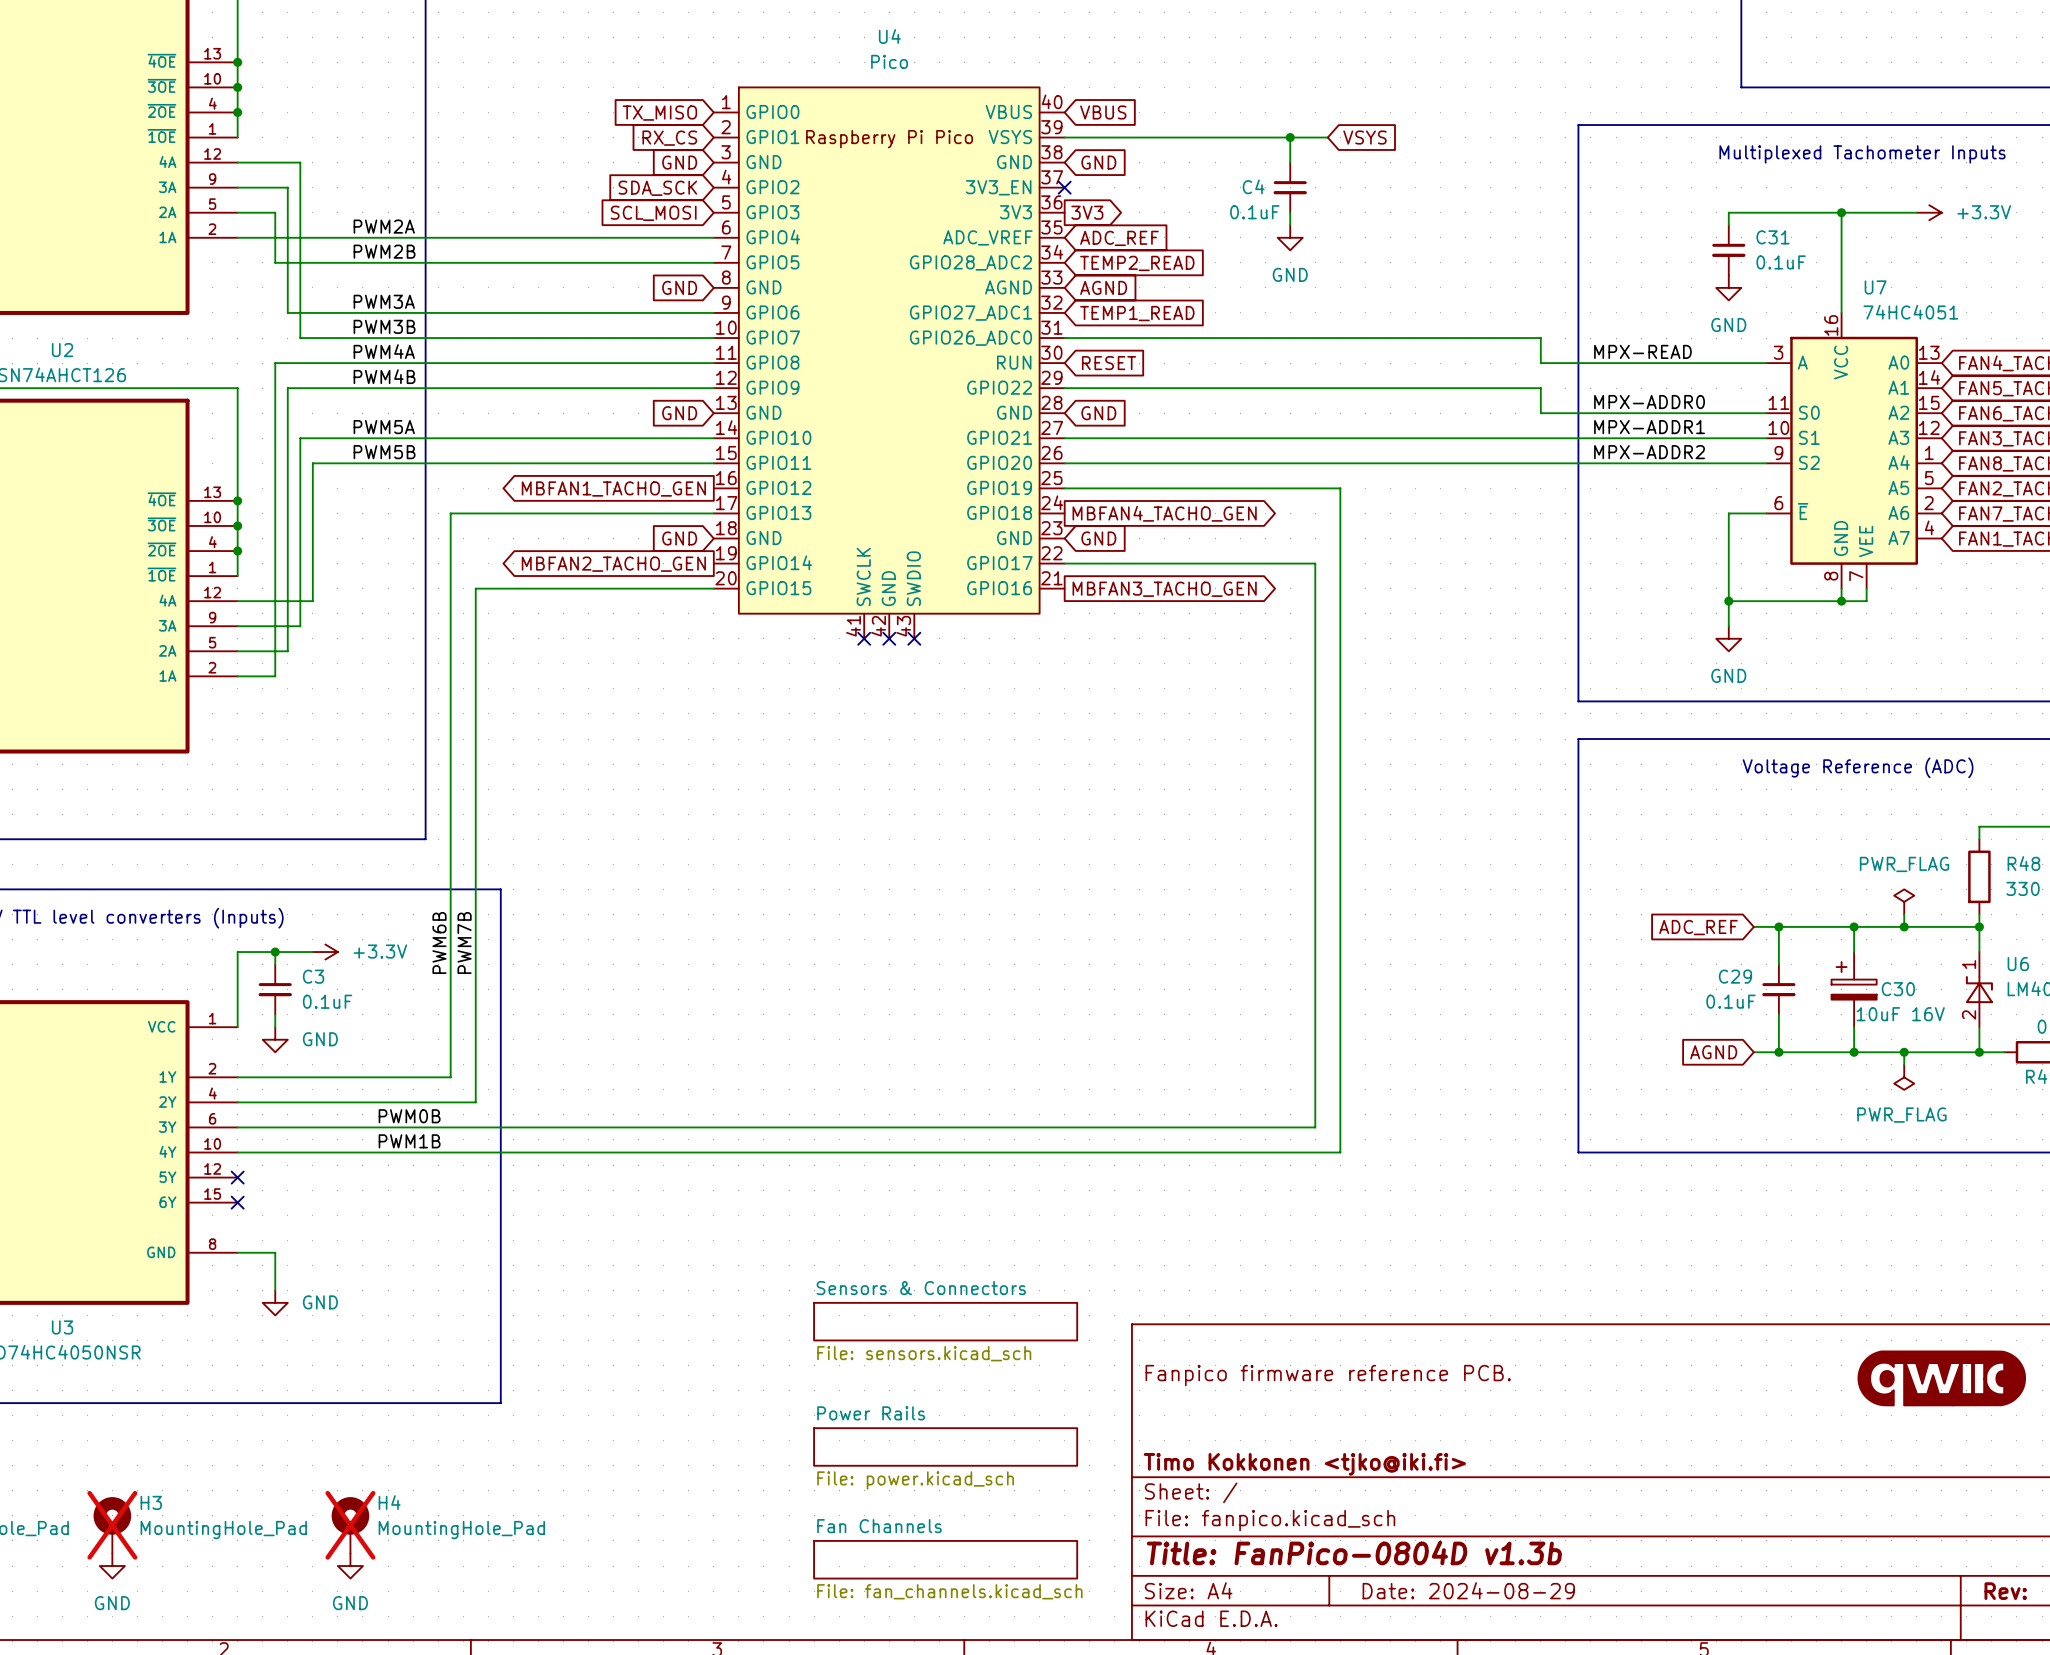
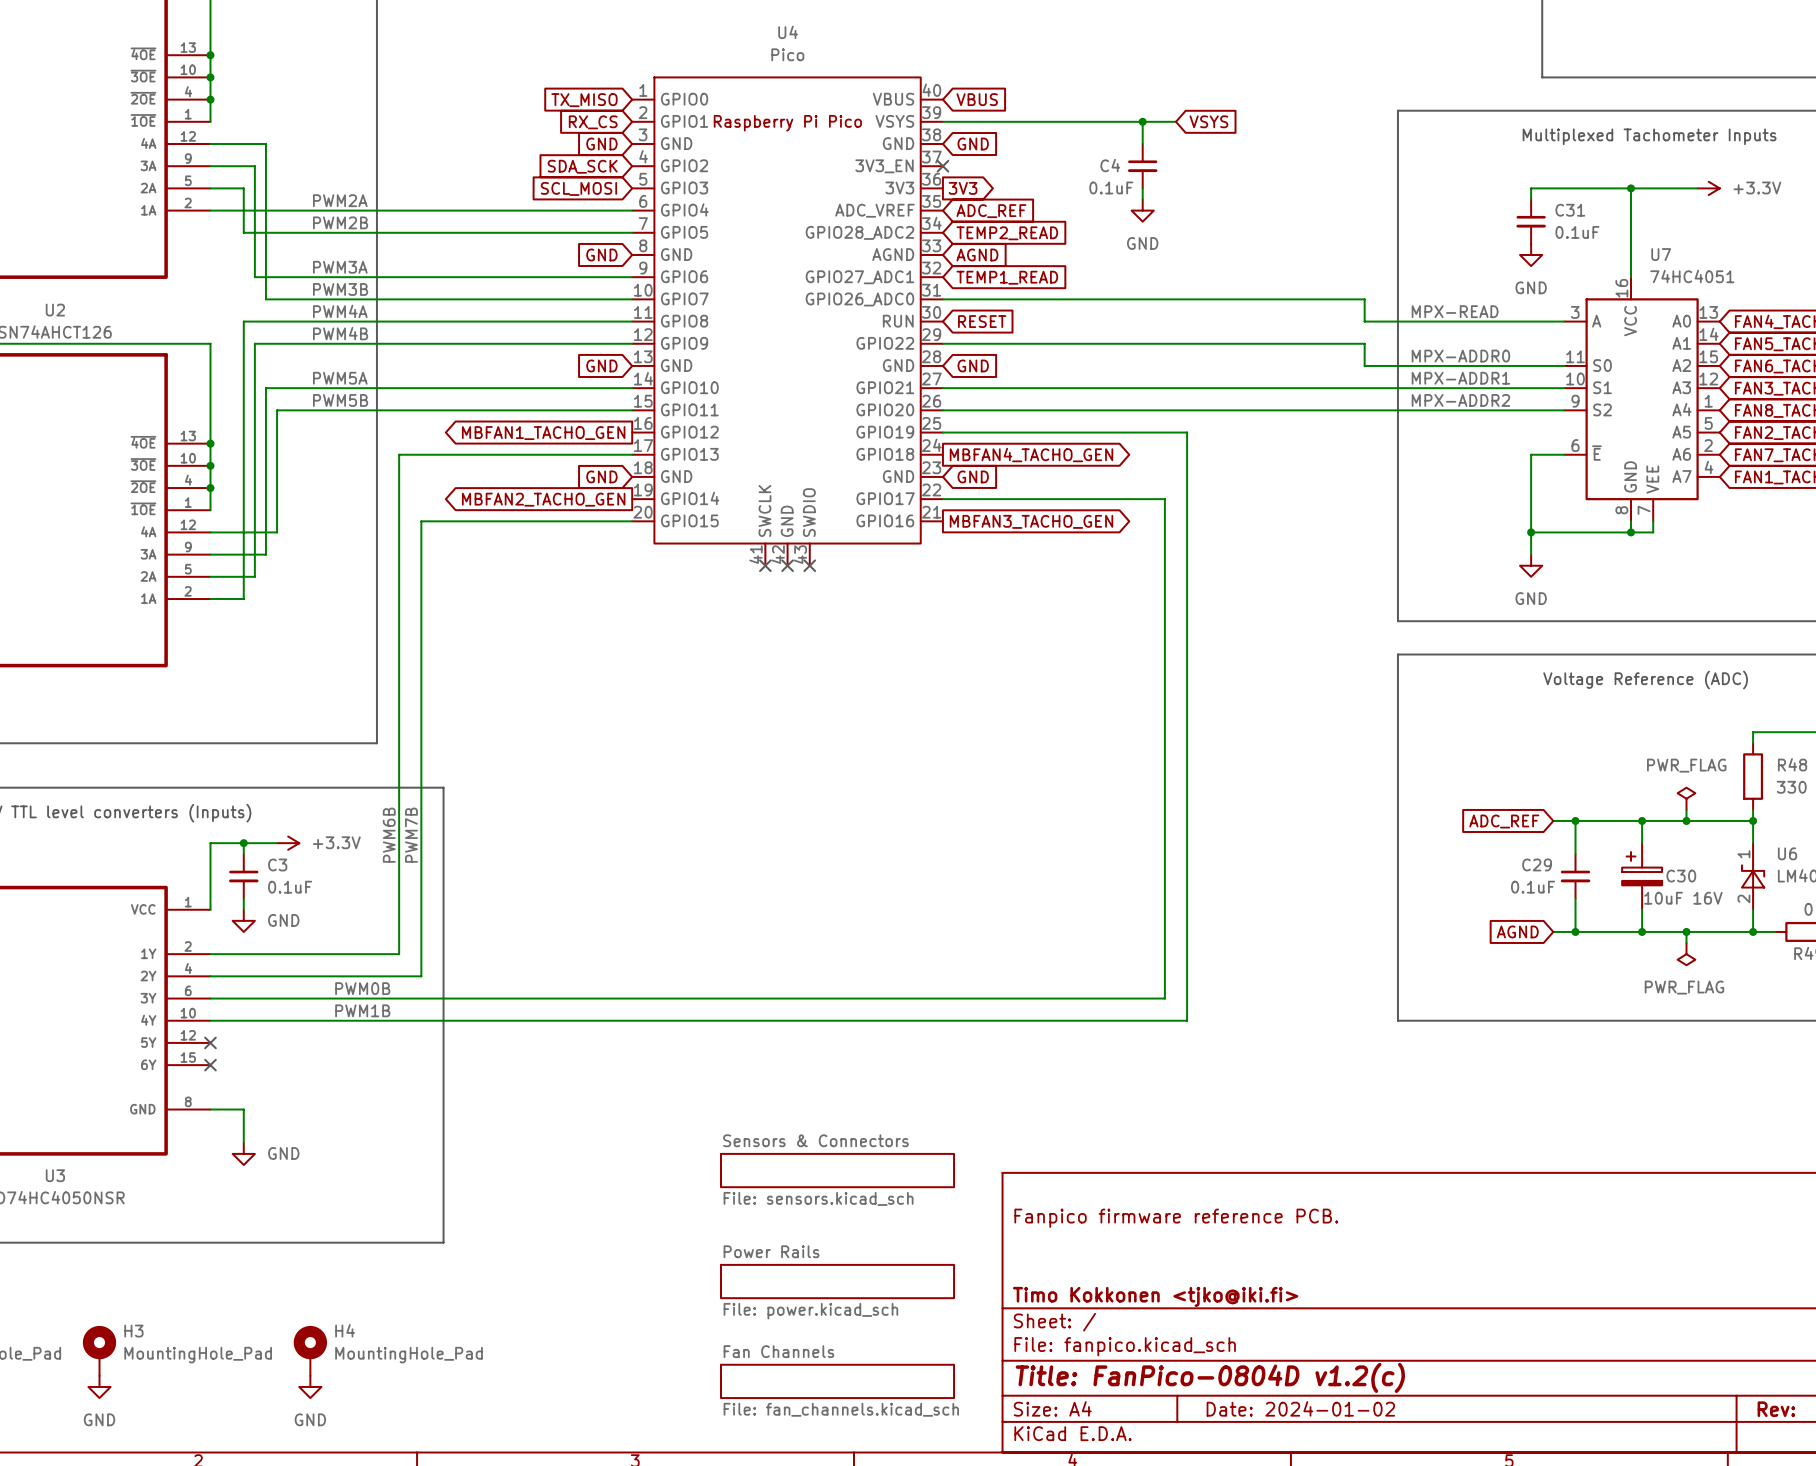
part: (1941, 1378) -> none
H3 do-not-place cross: (112, 1525) -> none
H4 do-not-place cross: (350, 1525) -> none
title block: Title: FanPico-0804D v1.3b (1354, 1552) -> Title: FanPico-0804D v1.2(c) (1210, 1377)
title block: Date: 2024-08-29 (1468, 1590) -> Date: 2024-01-02 (1300, 1408)

